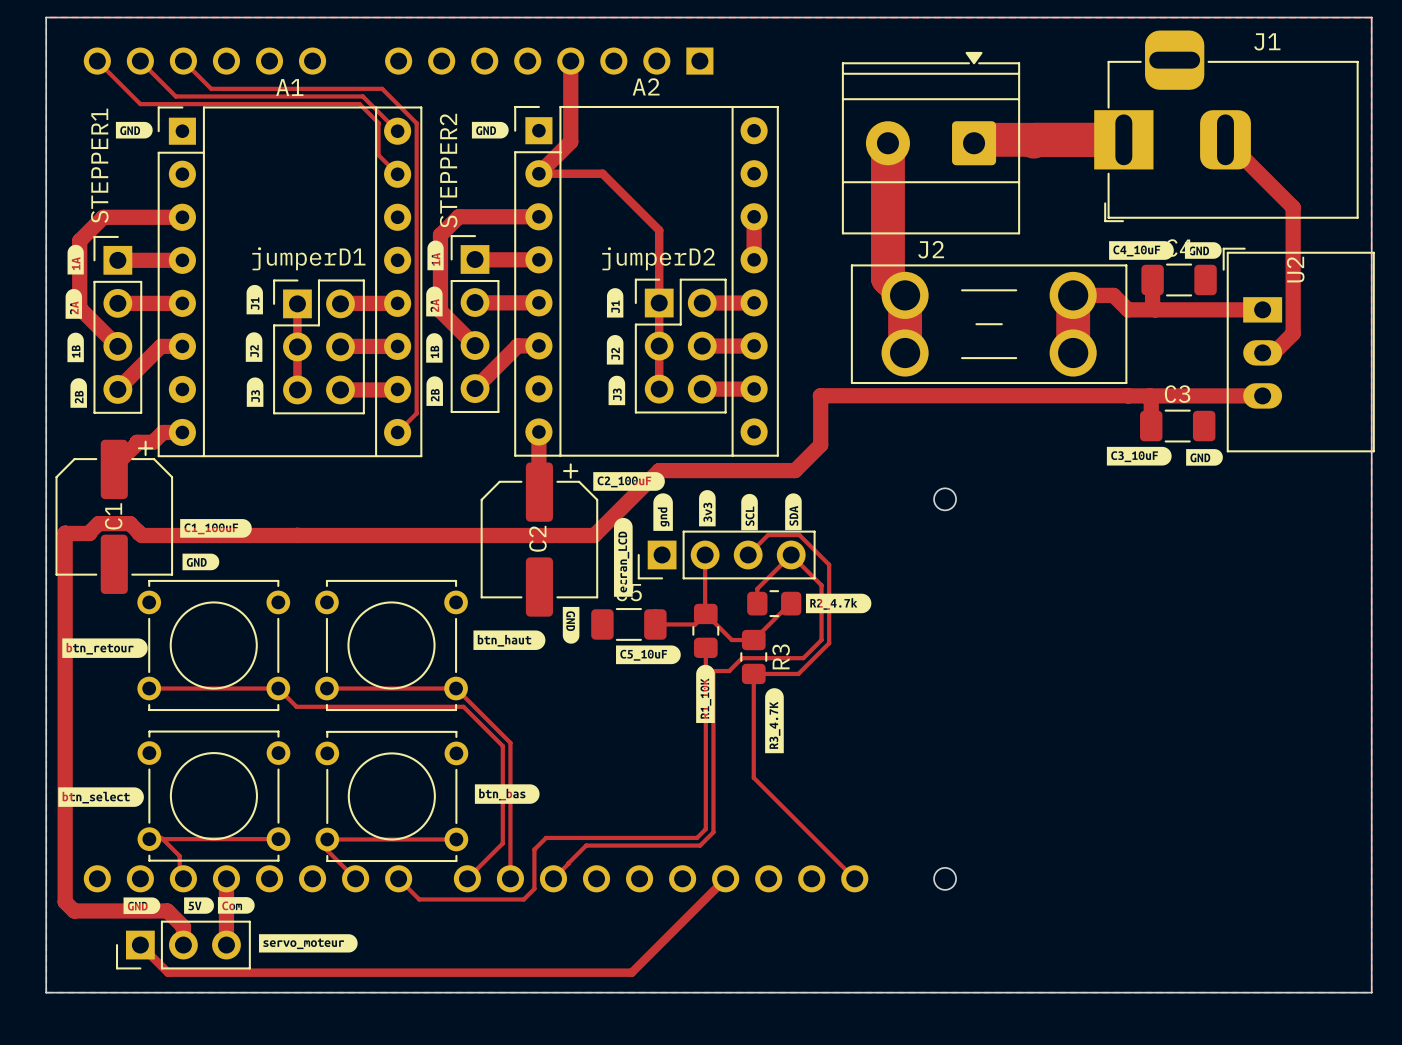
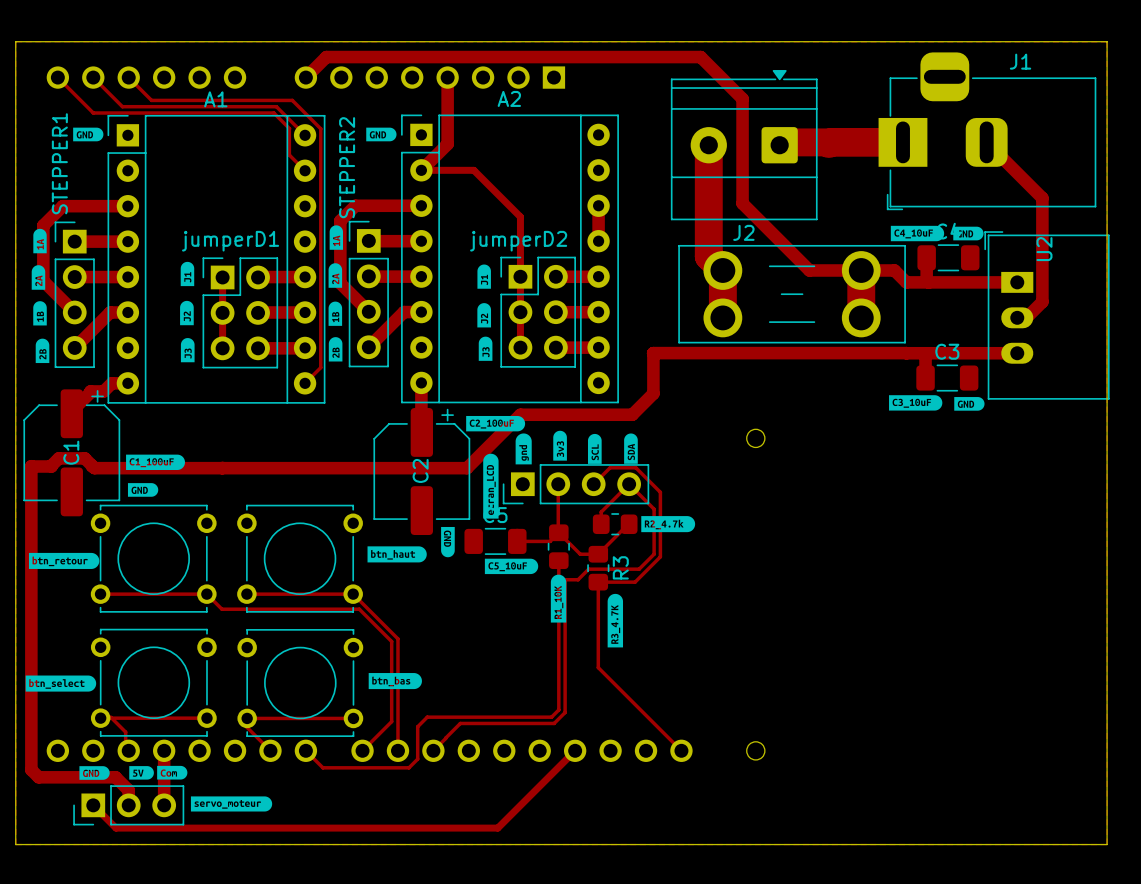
track: none -> (305, 77) (326, 57) (700, 57) (742, 98) (742, 203) (809, 270) (861, 270)

